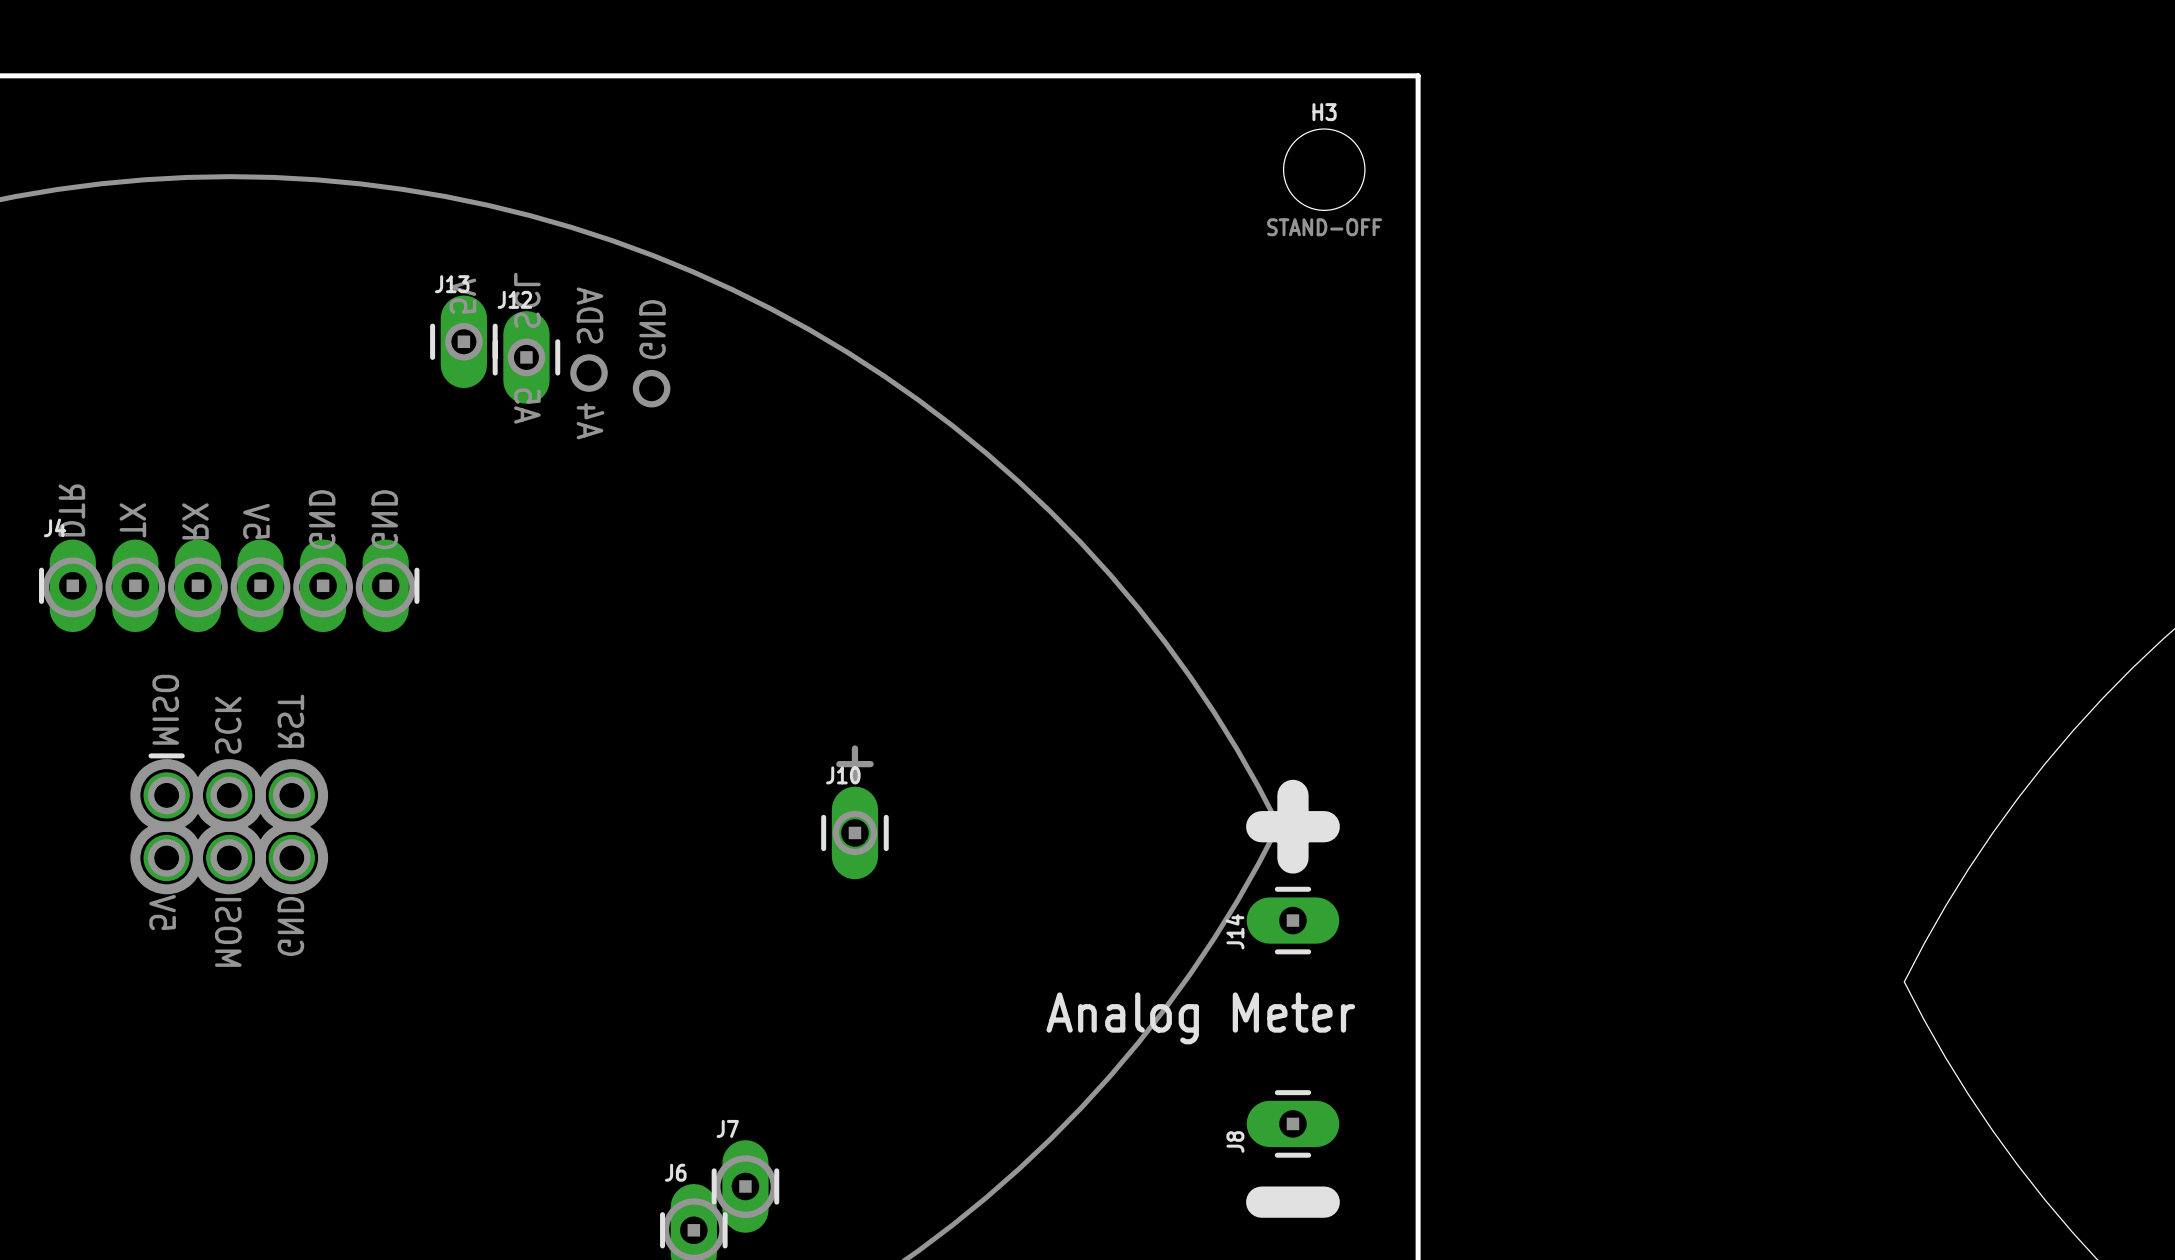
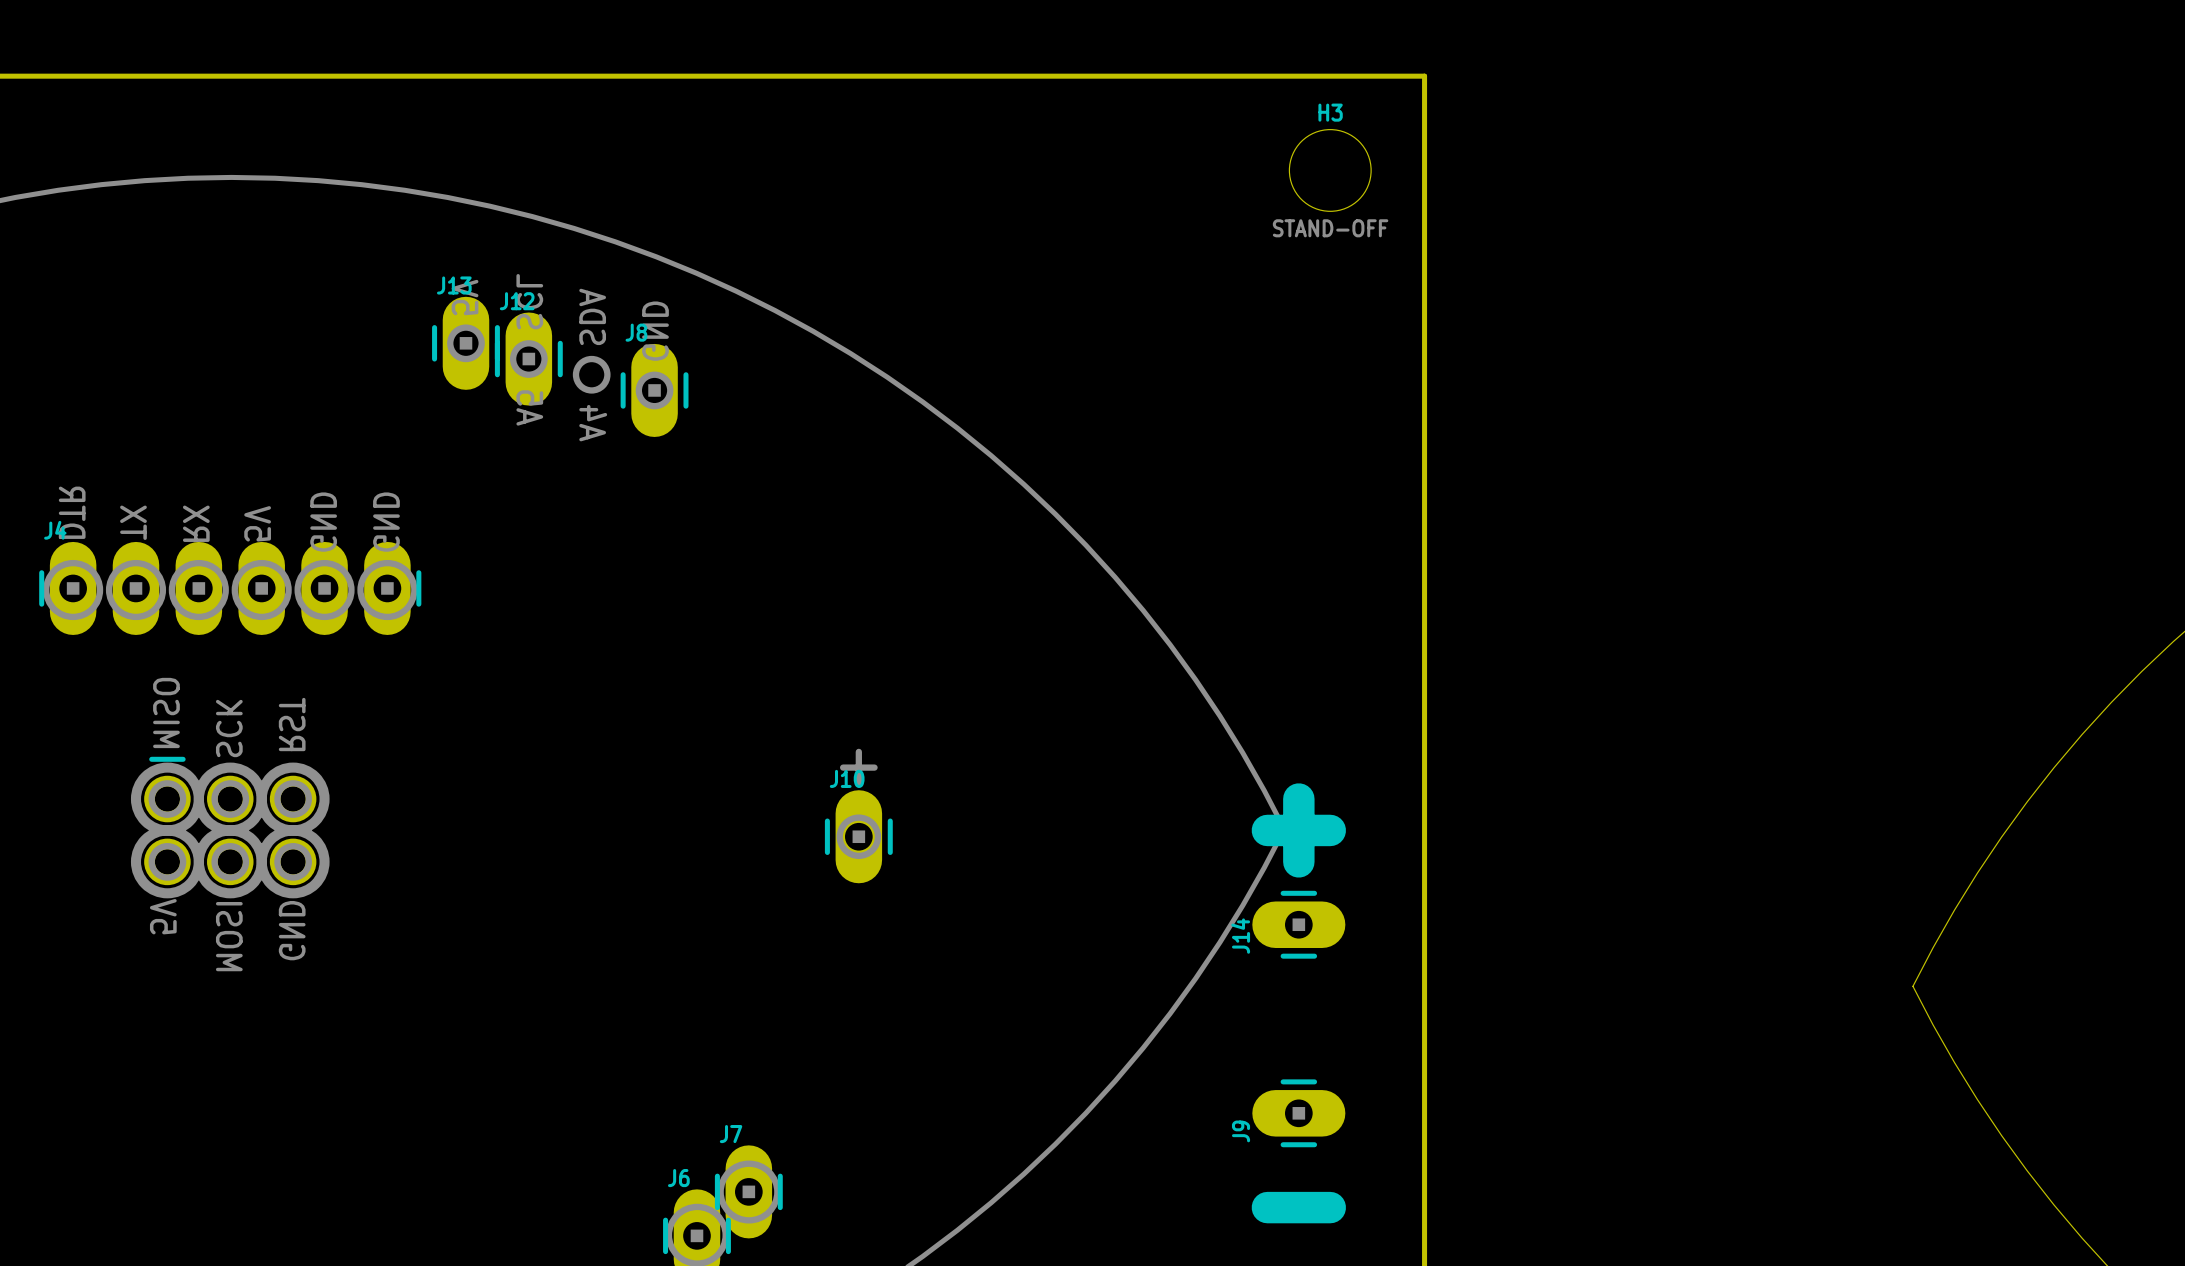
text: Analog Meter (1200, 1018) -> none
J9: none -> (1298, 1113)
J8 rotation: 0° (1292, 1123) -> 90° clockwise (654, 390)
J8 position: (1292, 1123) -> (654, 390)

